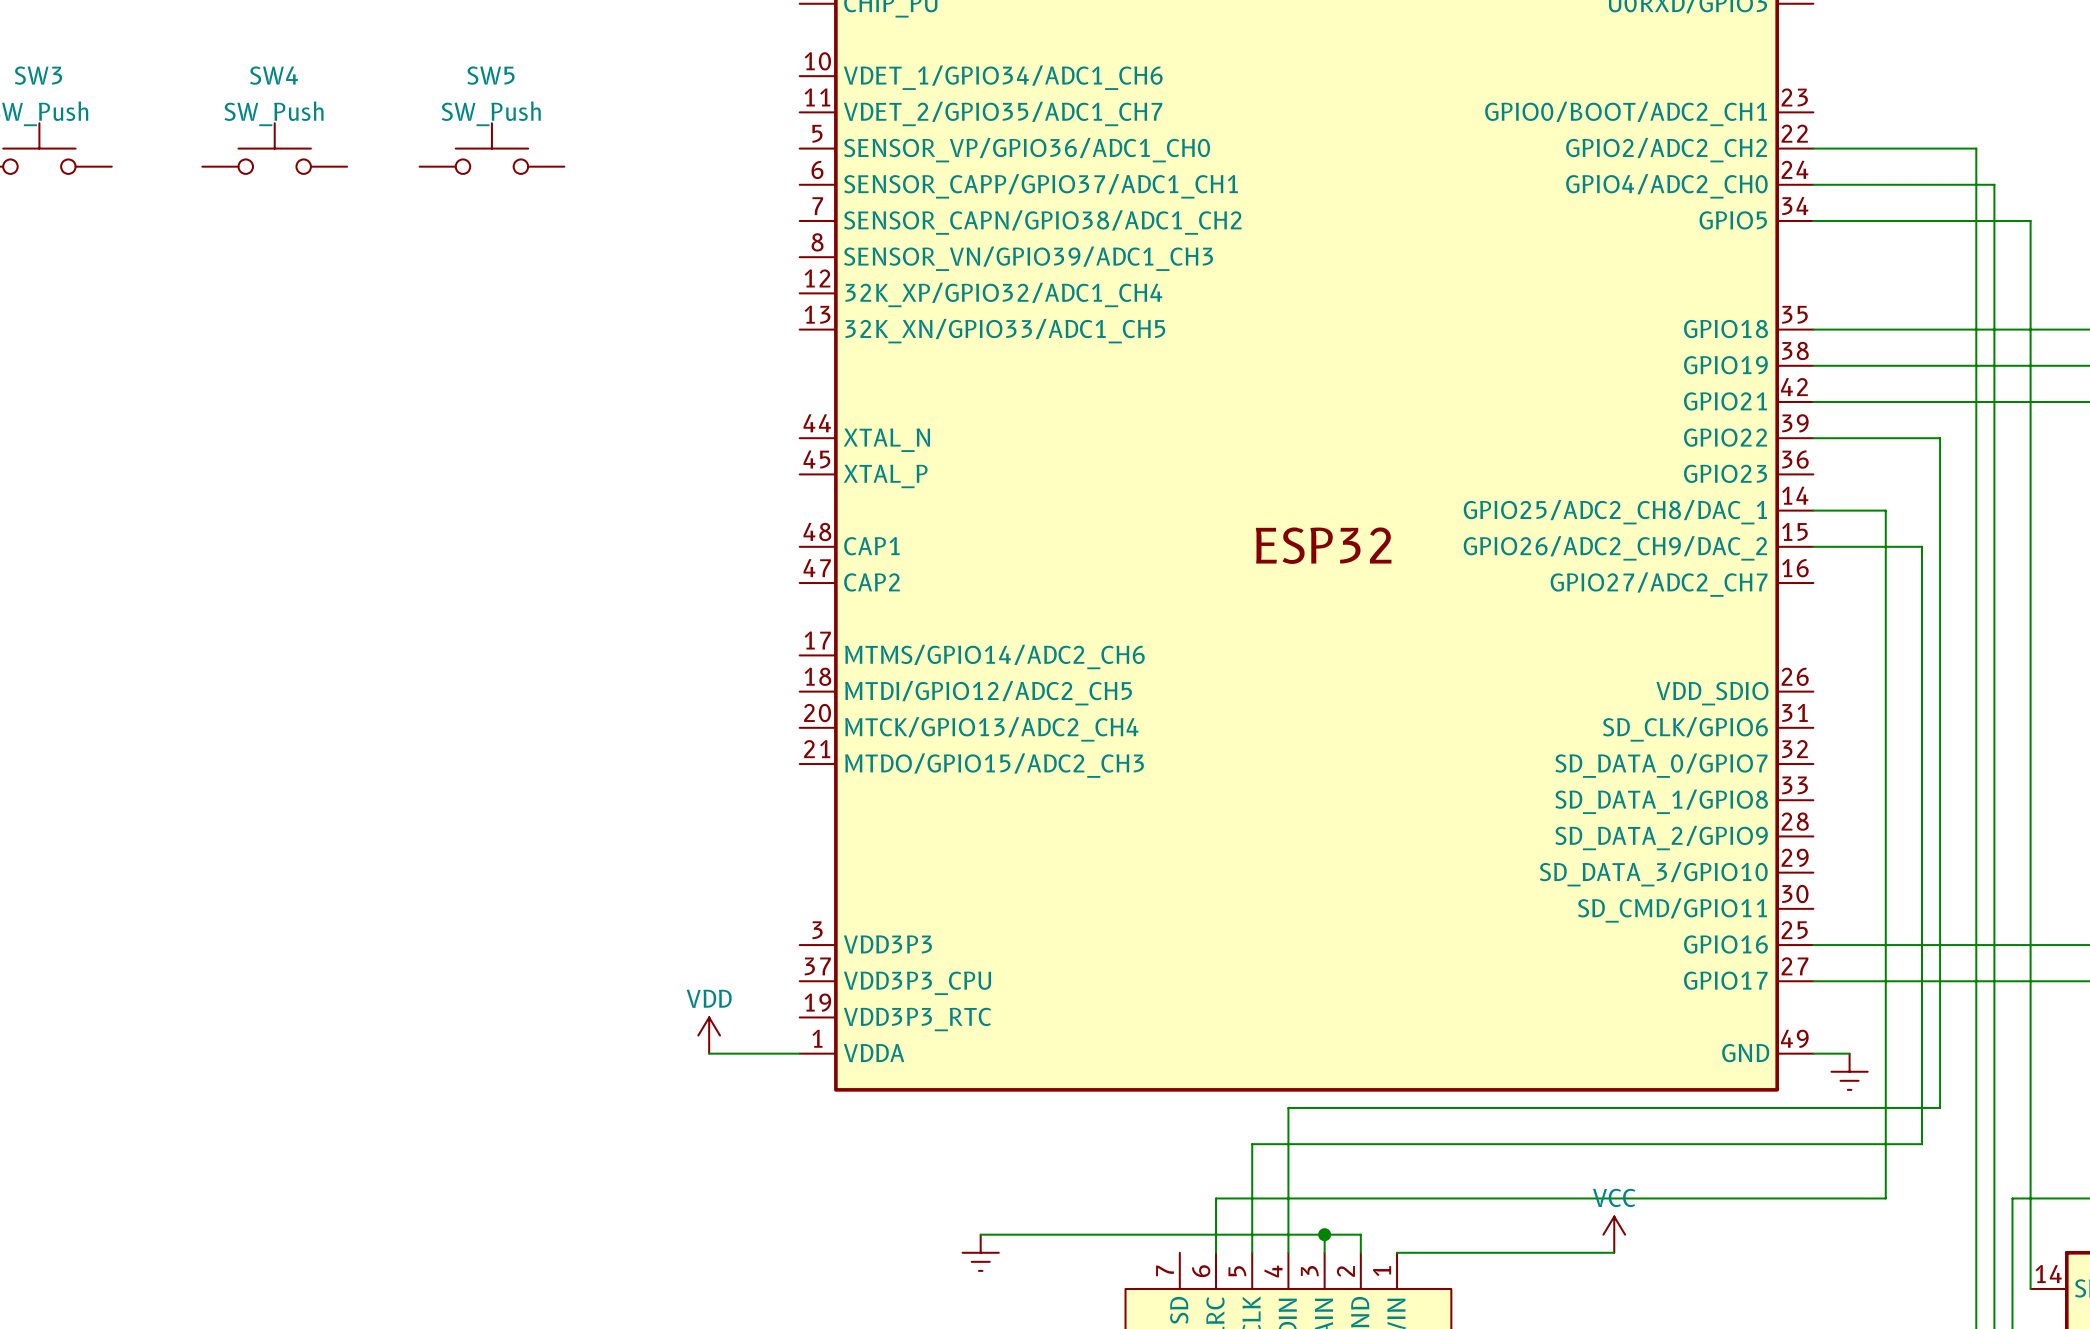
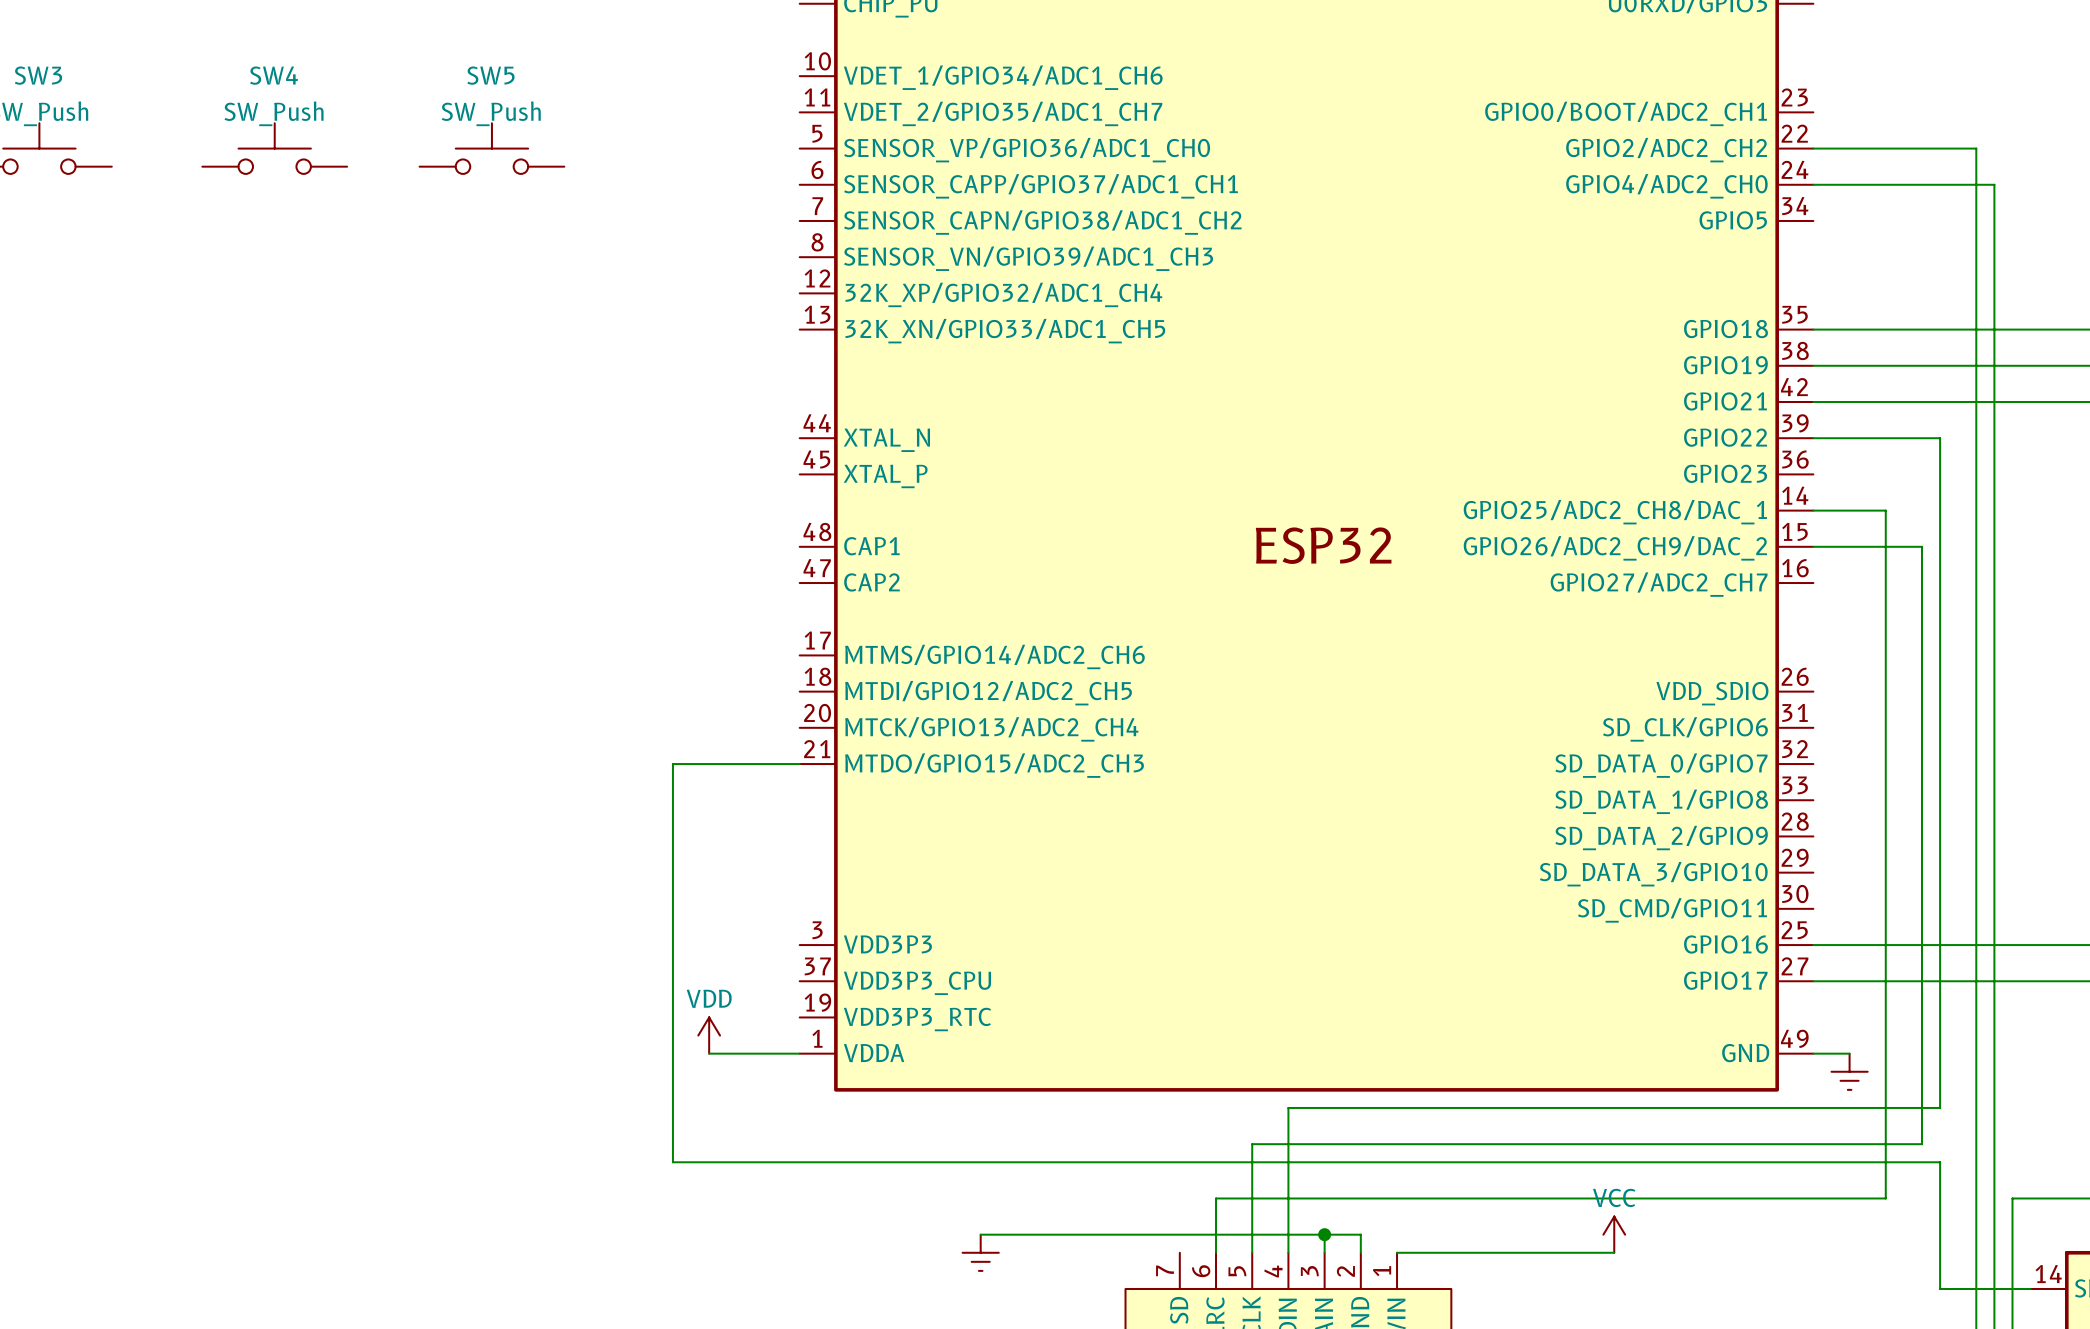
wire: (1813, 220) (2030, 220) (2030, 1288) -> (799, 764) (672, 764) (672, 1162) (1940, 1162) (1940, 1288) (2030, 1288)

